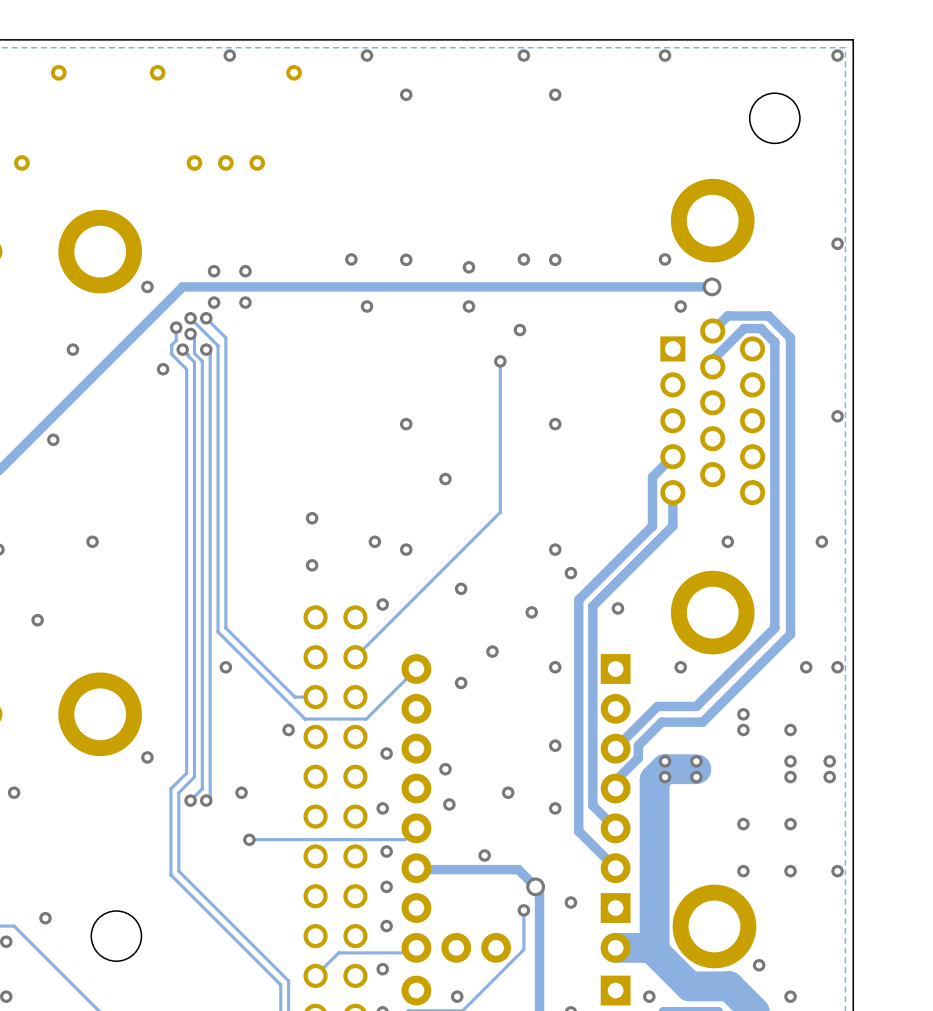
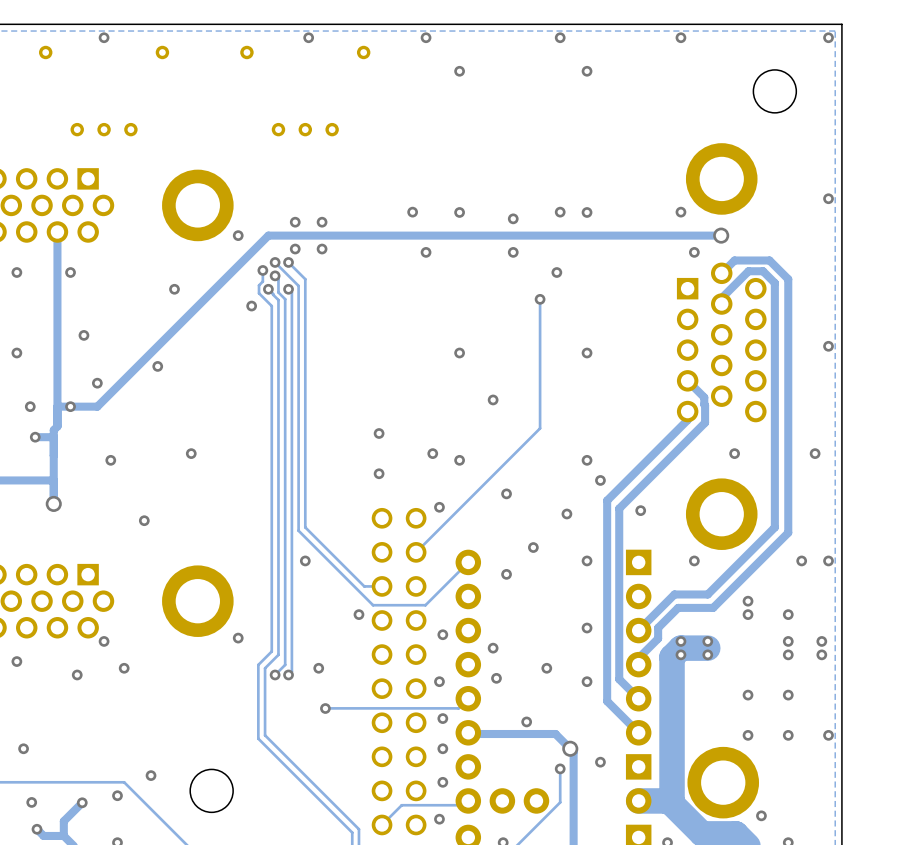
track: (672, 456) (652, 477) (652, 526) (578, 599) -> (687, 420) (607, 500) (607, 503)
track: (672, 502) (672, 526) -> (687, 380) (704, 397) (705, 405) (705, 422) (687, 440)

